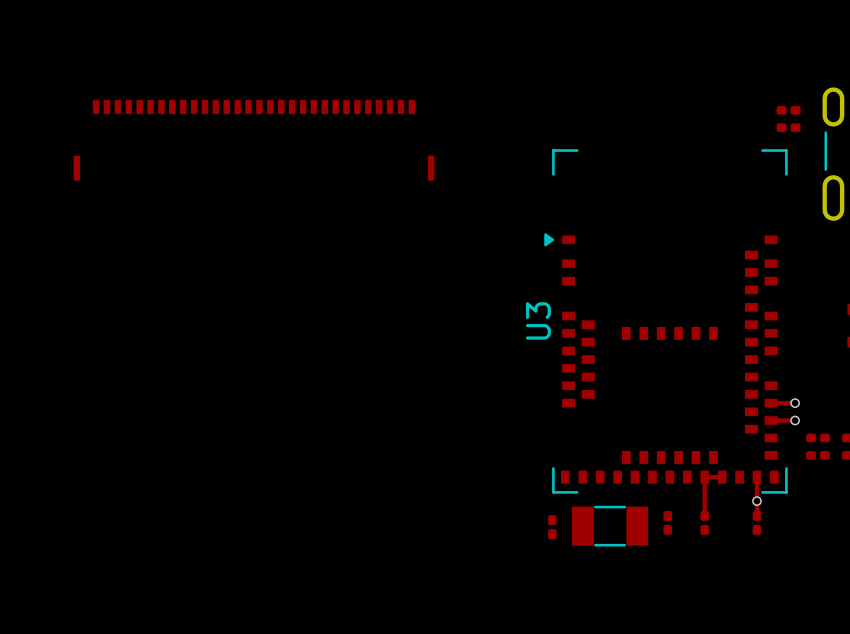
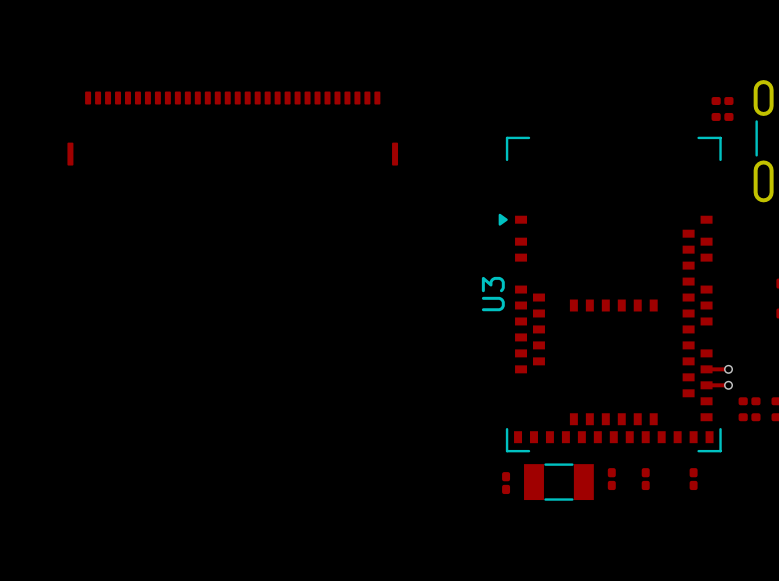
track: (722, 477) (704, 477) (704, 515) -> none
track: (756, 477) (756, 515) -> none
via: (756, 501) -> none

